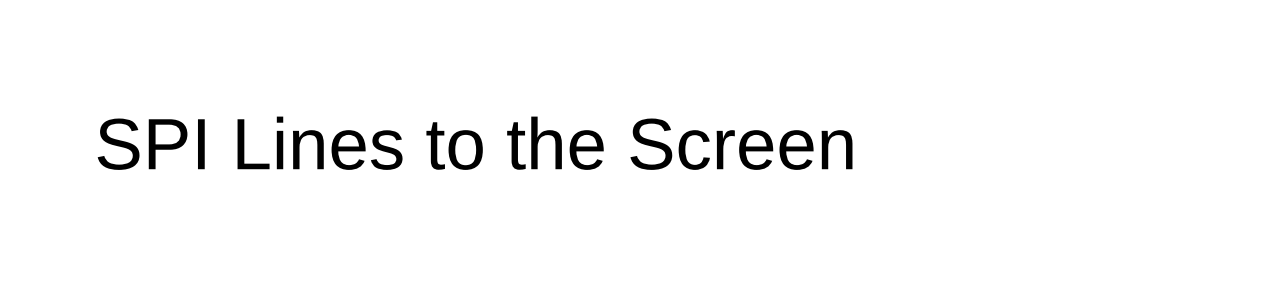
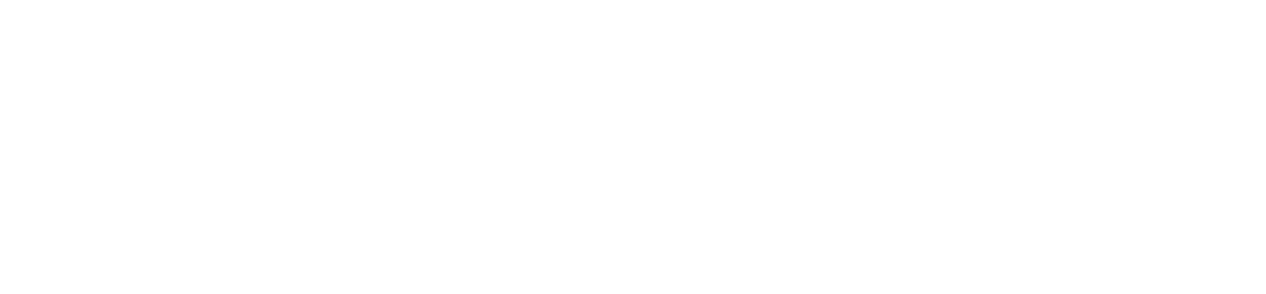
text: SPI Lines to the Screen (475, 143) -> none

